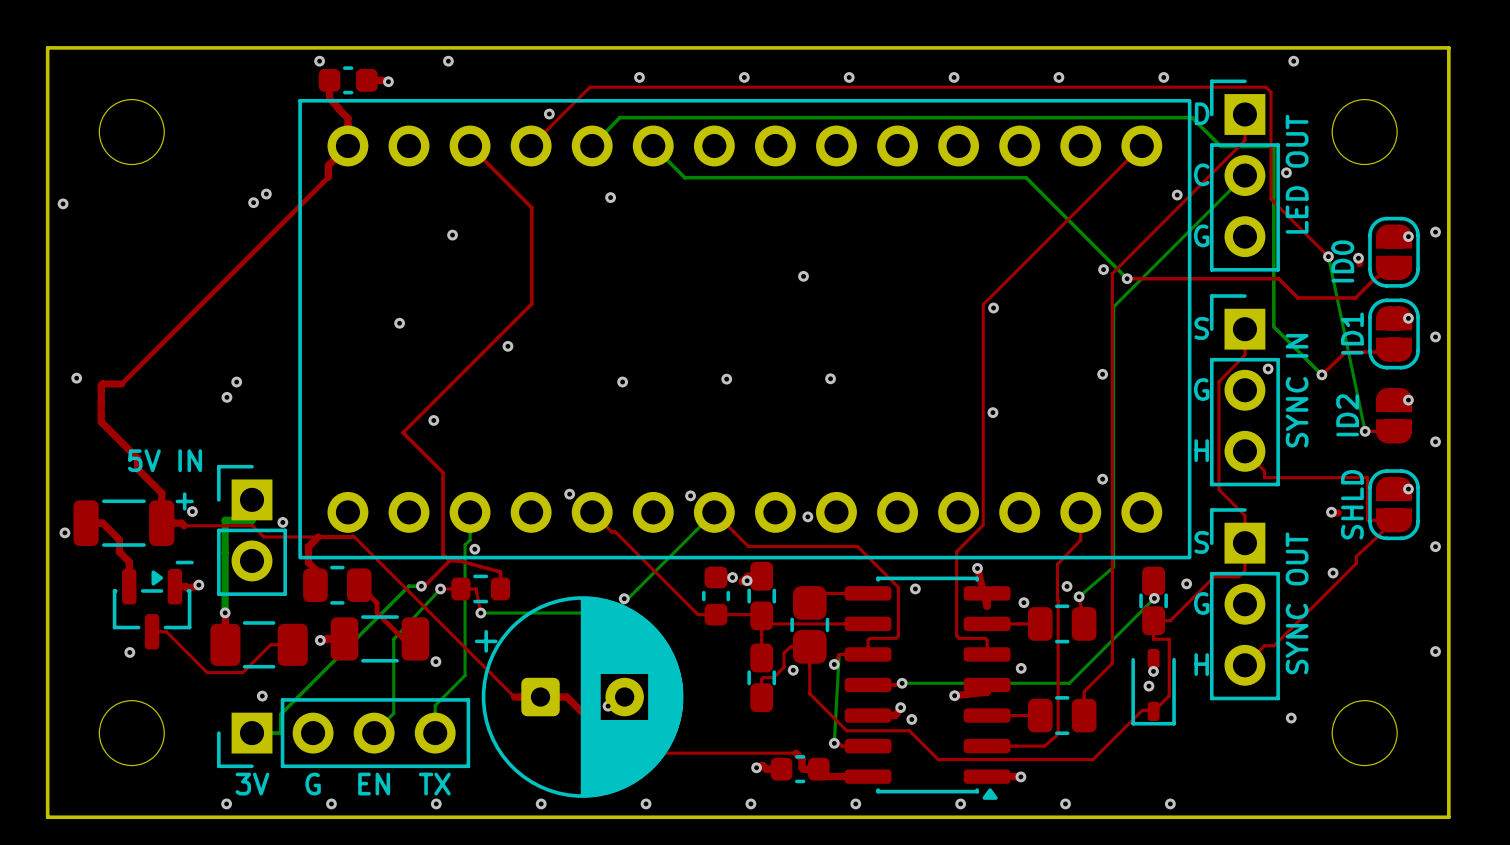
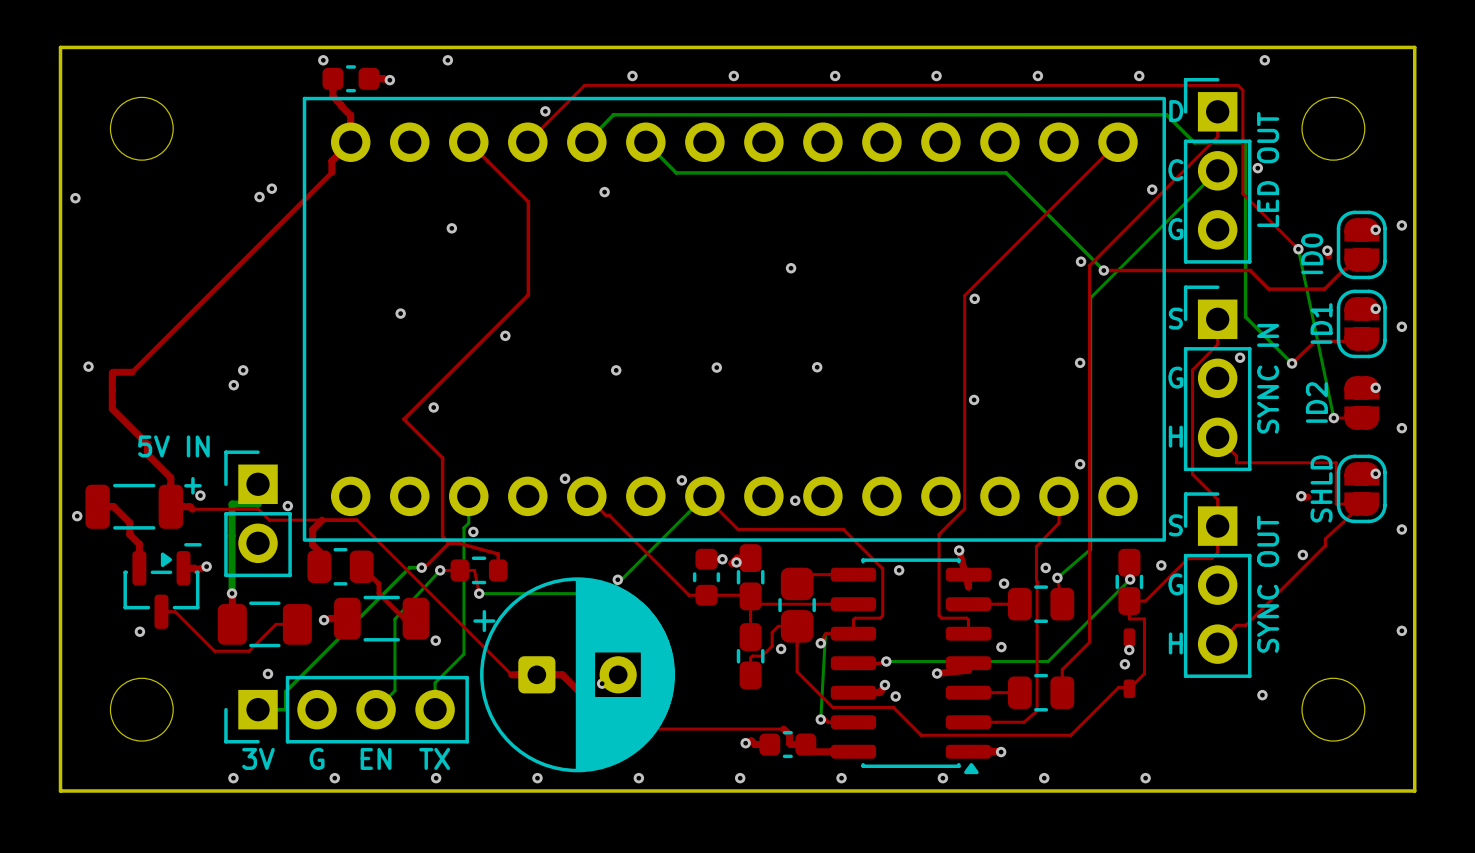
part footprint: [1131, 648, 1176, 726] -> [1123, 628, 1136, 699]

